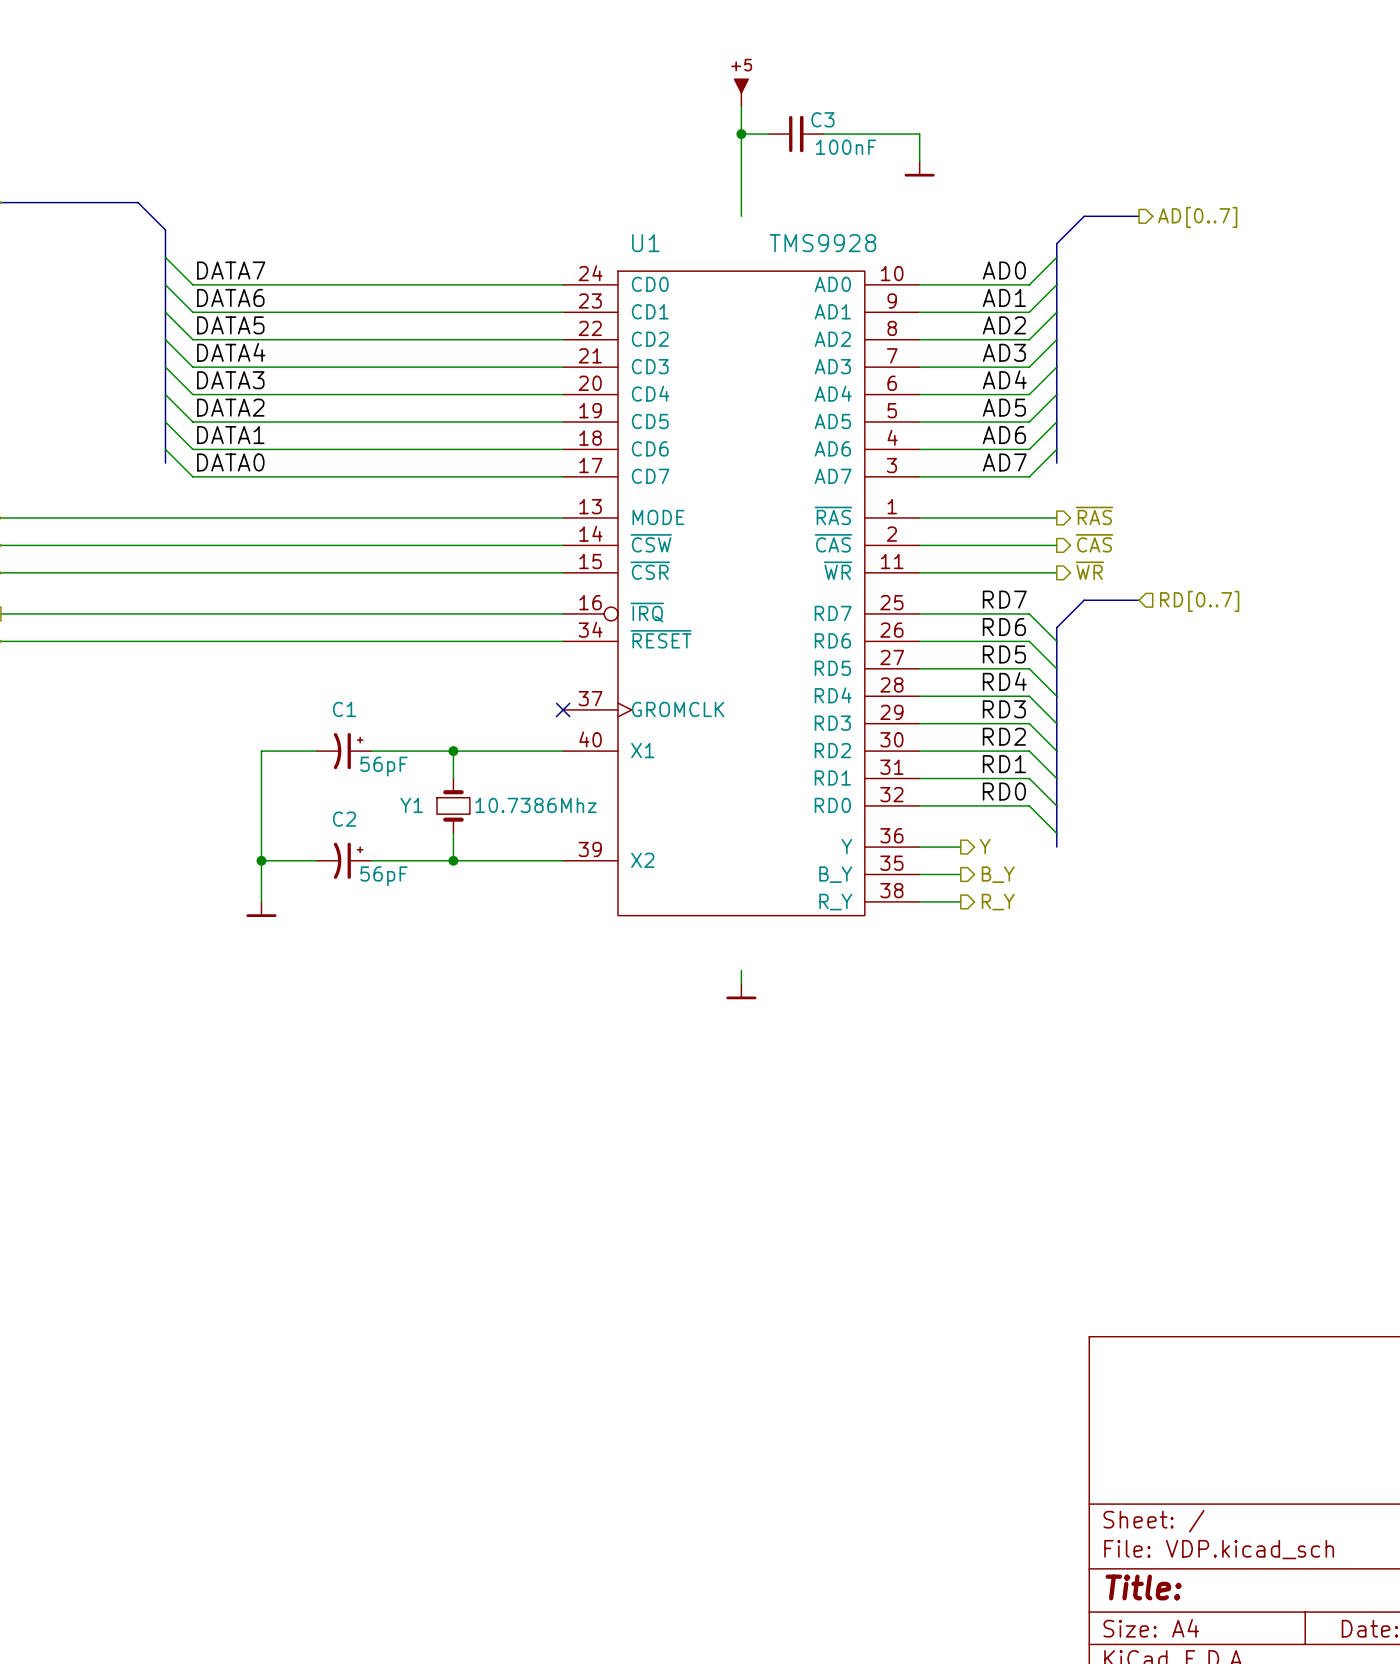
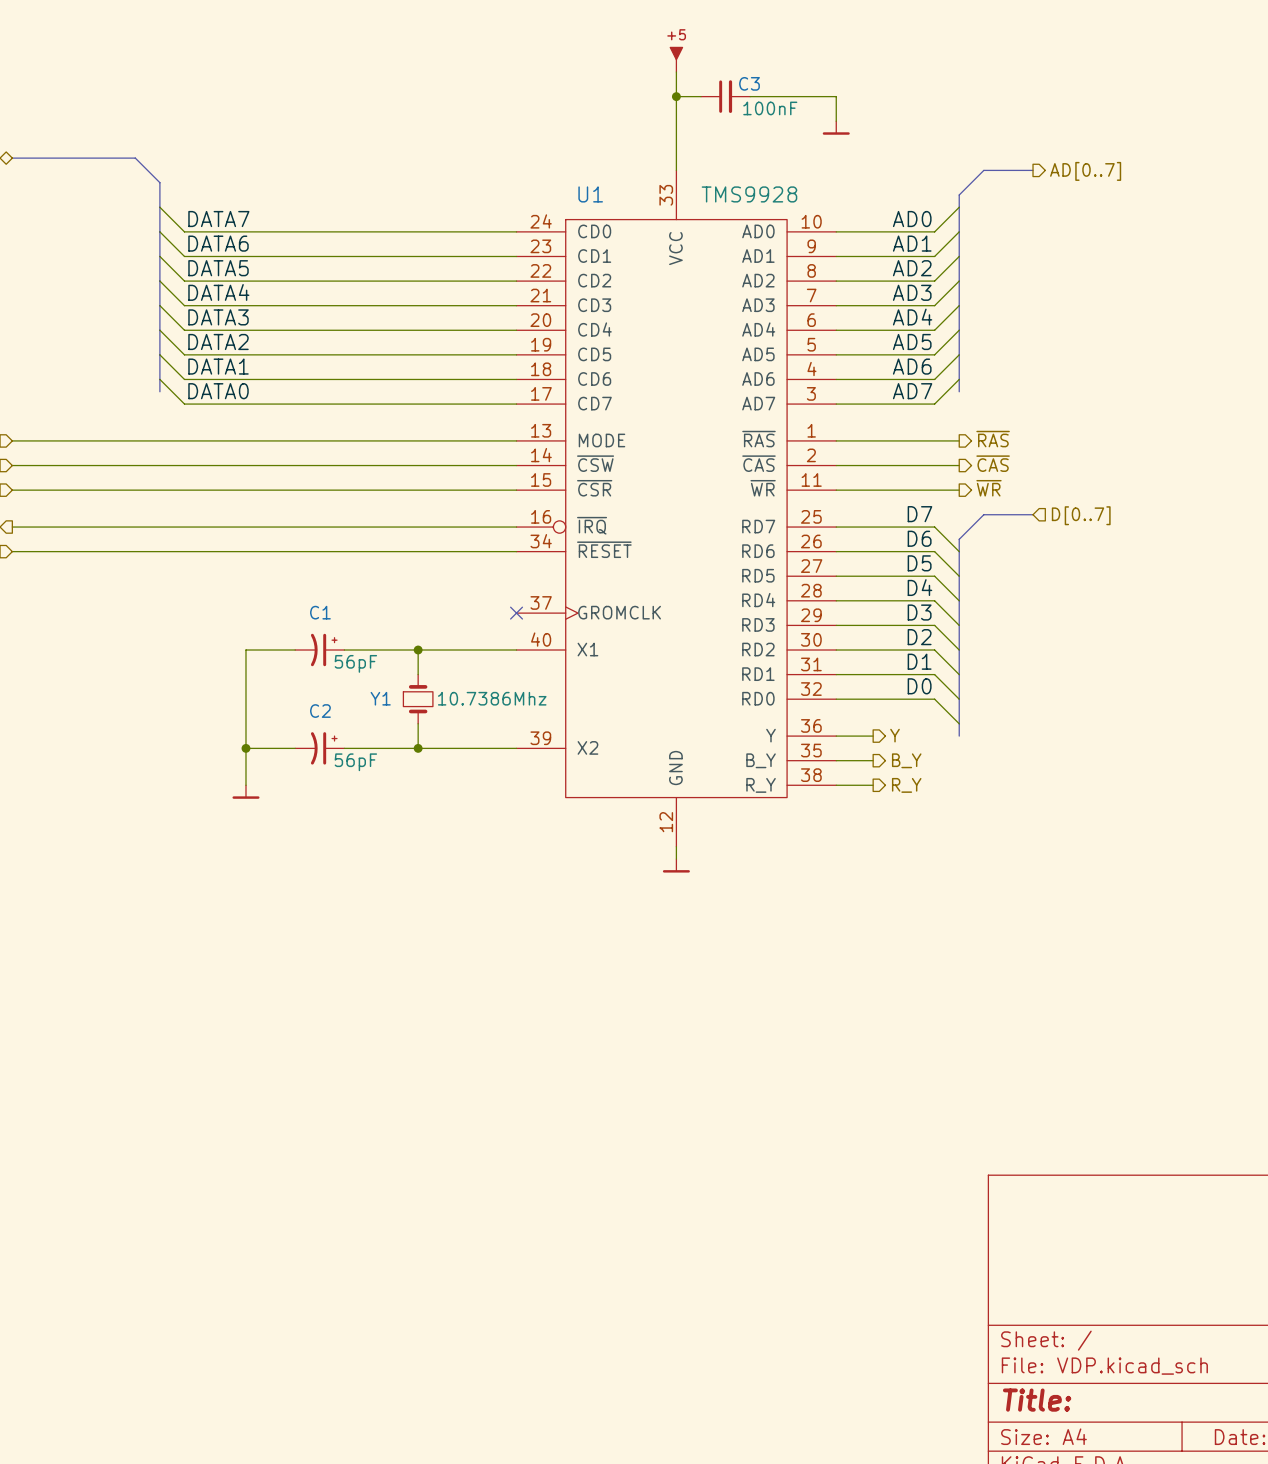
U1 symbol: [563, 271, 920, 916] -> [516, 170, 837, 847]
label: RD7 (1004, 599) -> D7 (919, 514)
hierarchical label: RD[0..7] (1199, 601) -> D[0..7] (1081, 515)
label: RD6 (1004, 627) -> D6 (919, 538)
label: RD5 (1004, 654) -> D5 (919, 563)
label: RD4 (1004, 681) -> D4 (919, 587)
label: RD3 (1004, 709) -> D3 (919, 612)
label: RD2 (1004, 736) -> D2 (919, 637)
label: RD1 (1004, 764) -> D1 (919, 661)
label: RD0 (1004, 791) -> D0 (919, 686)

